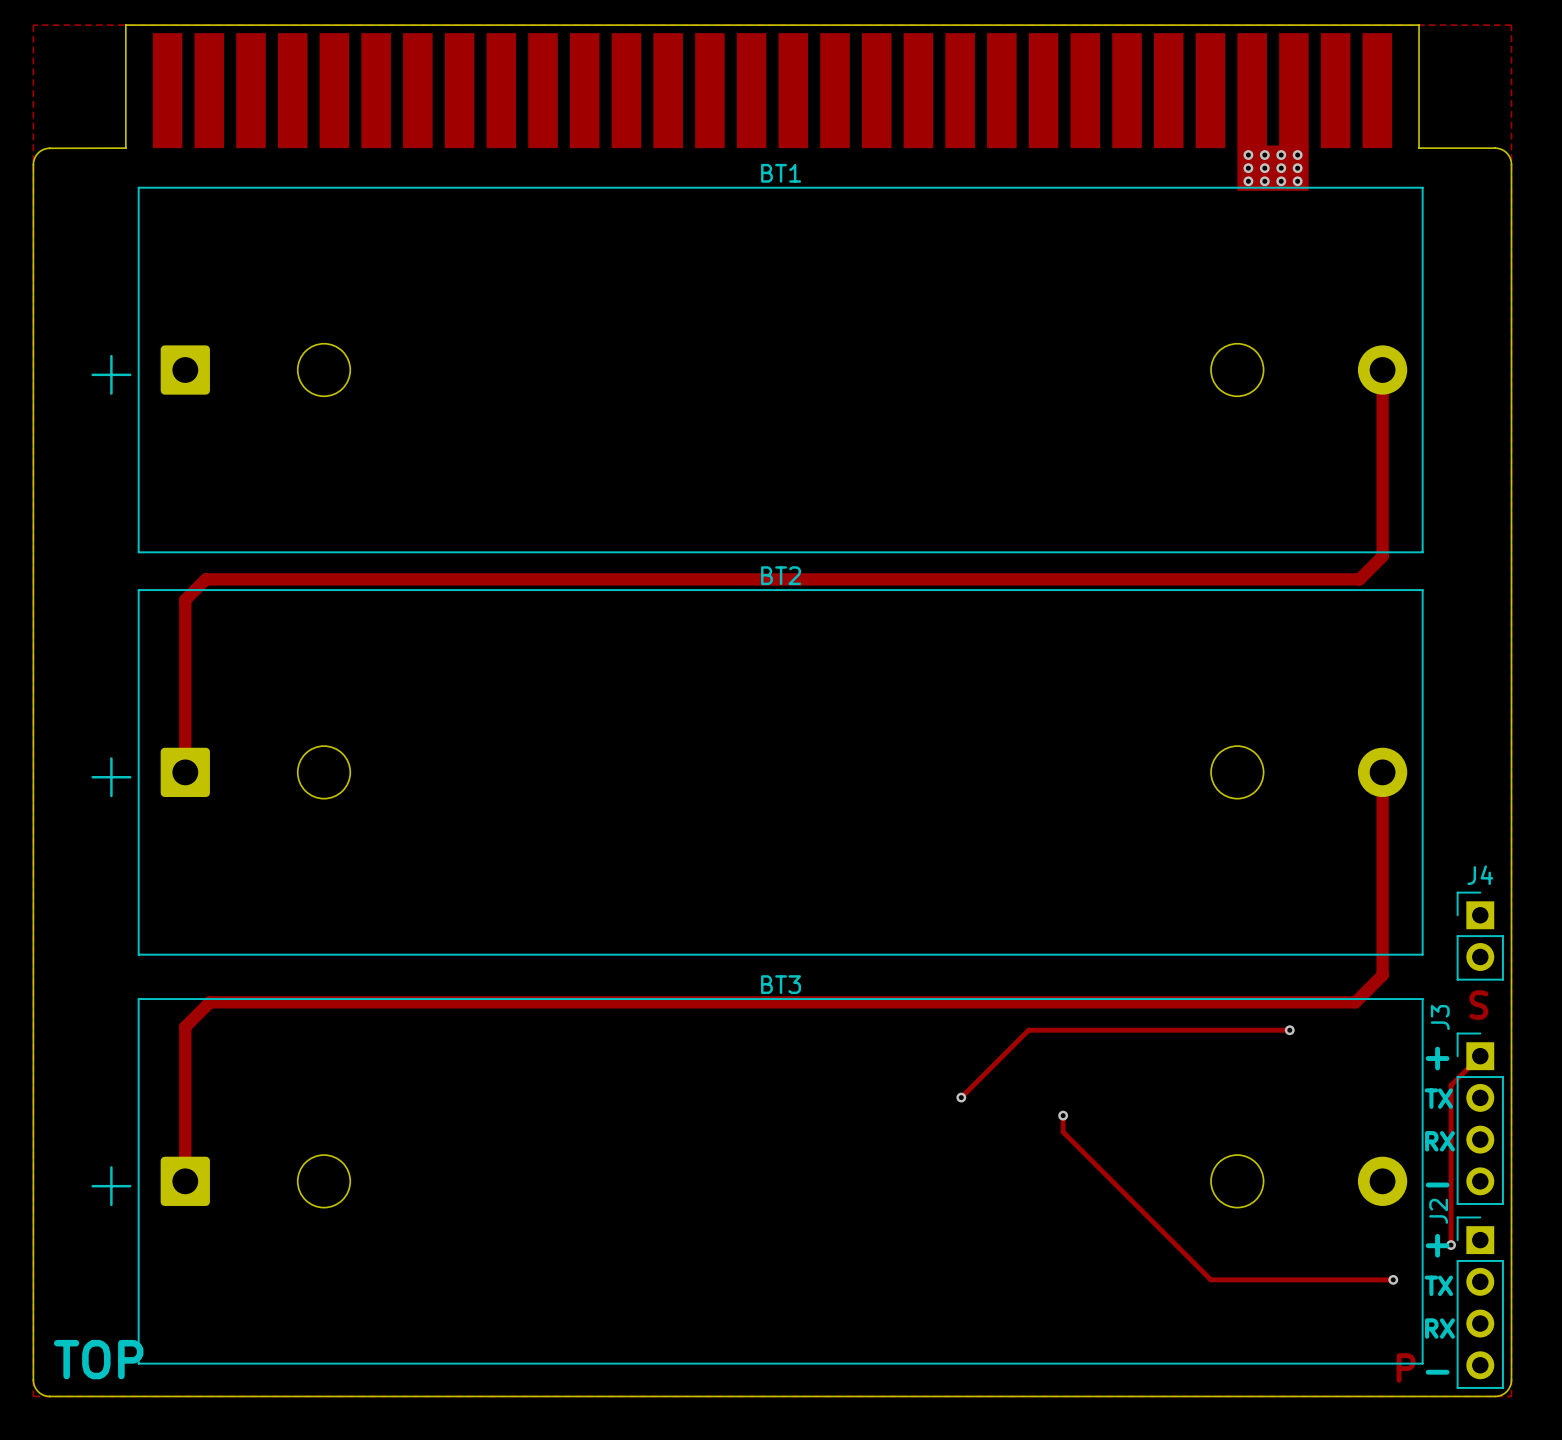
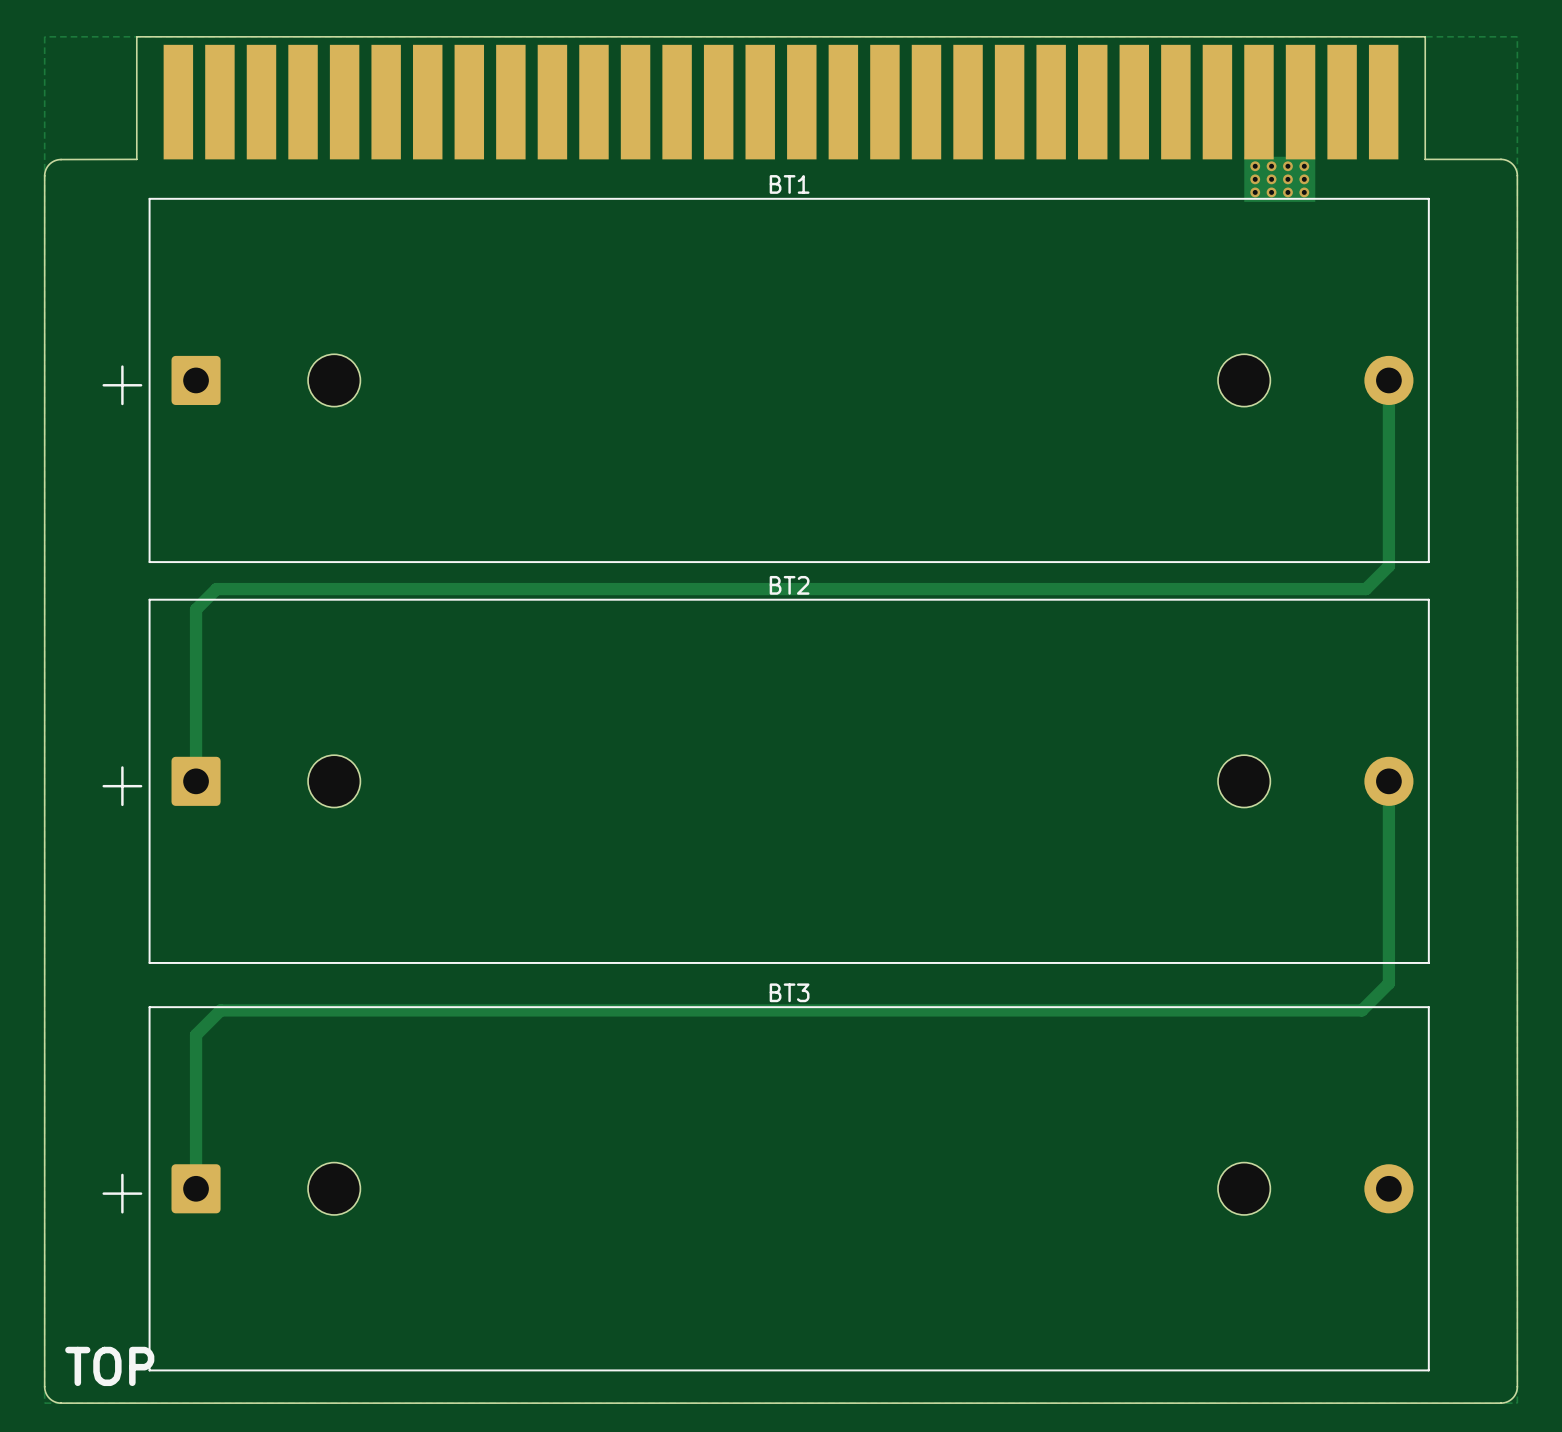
J4: (1480, 936) -> none
text: S (1478, 1005) -> none
track: (1289, 1030) (1028, 1030) (961, 1097) -> none
via: (1289, 1030) -> none
track: (1480, 1056) (1451, 1085) (1451, 1245) -> none
text: + (1437, 1058) -> none
via: (961, 1097) -> none
text: TX (1438, 1098) -> none
track: (1063, 1115) (1063, 1132) (1210, 1279) (1393, 1279) -> none
via: (1063, 1115) -> none
J3: (1480, 1118) -> none
text: RX (1440, 1141) -> none
text: - (1437, 1184) -> none
text: + (1437, 1245) -> none
via: (1451, 1245) -> none
via: (1393, 1279) -> none
text: TX (1438, 1285) -> none
J2: (1480, 1302) -> none
text: RX (1440, 1328) -> none
text: P (1406, 1368) -> none
text: - (1437, 1372) -> none

